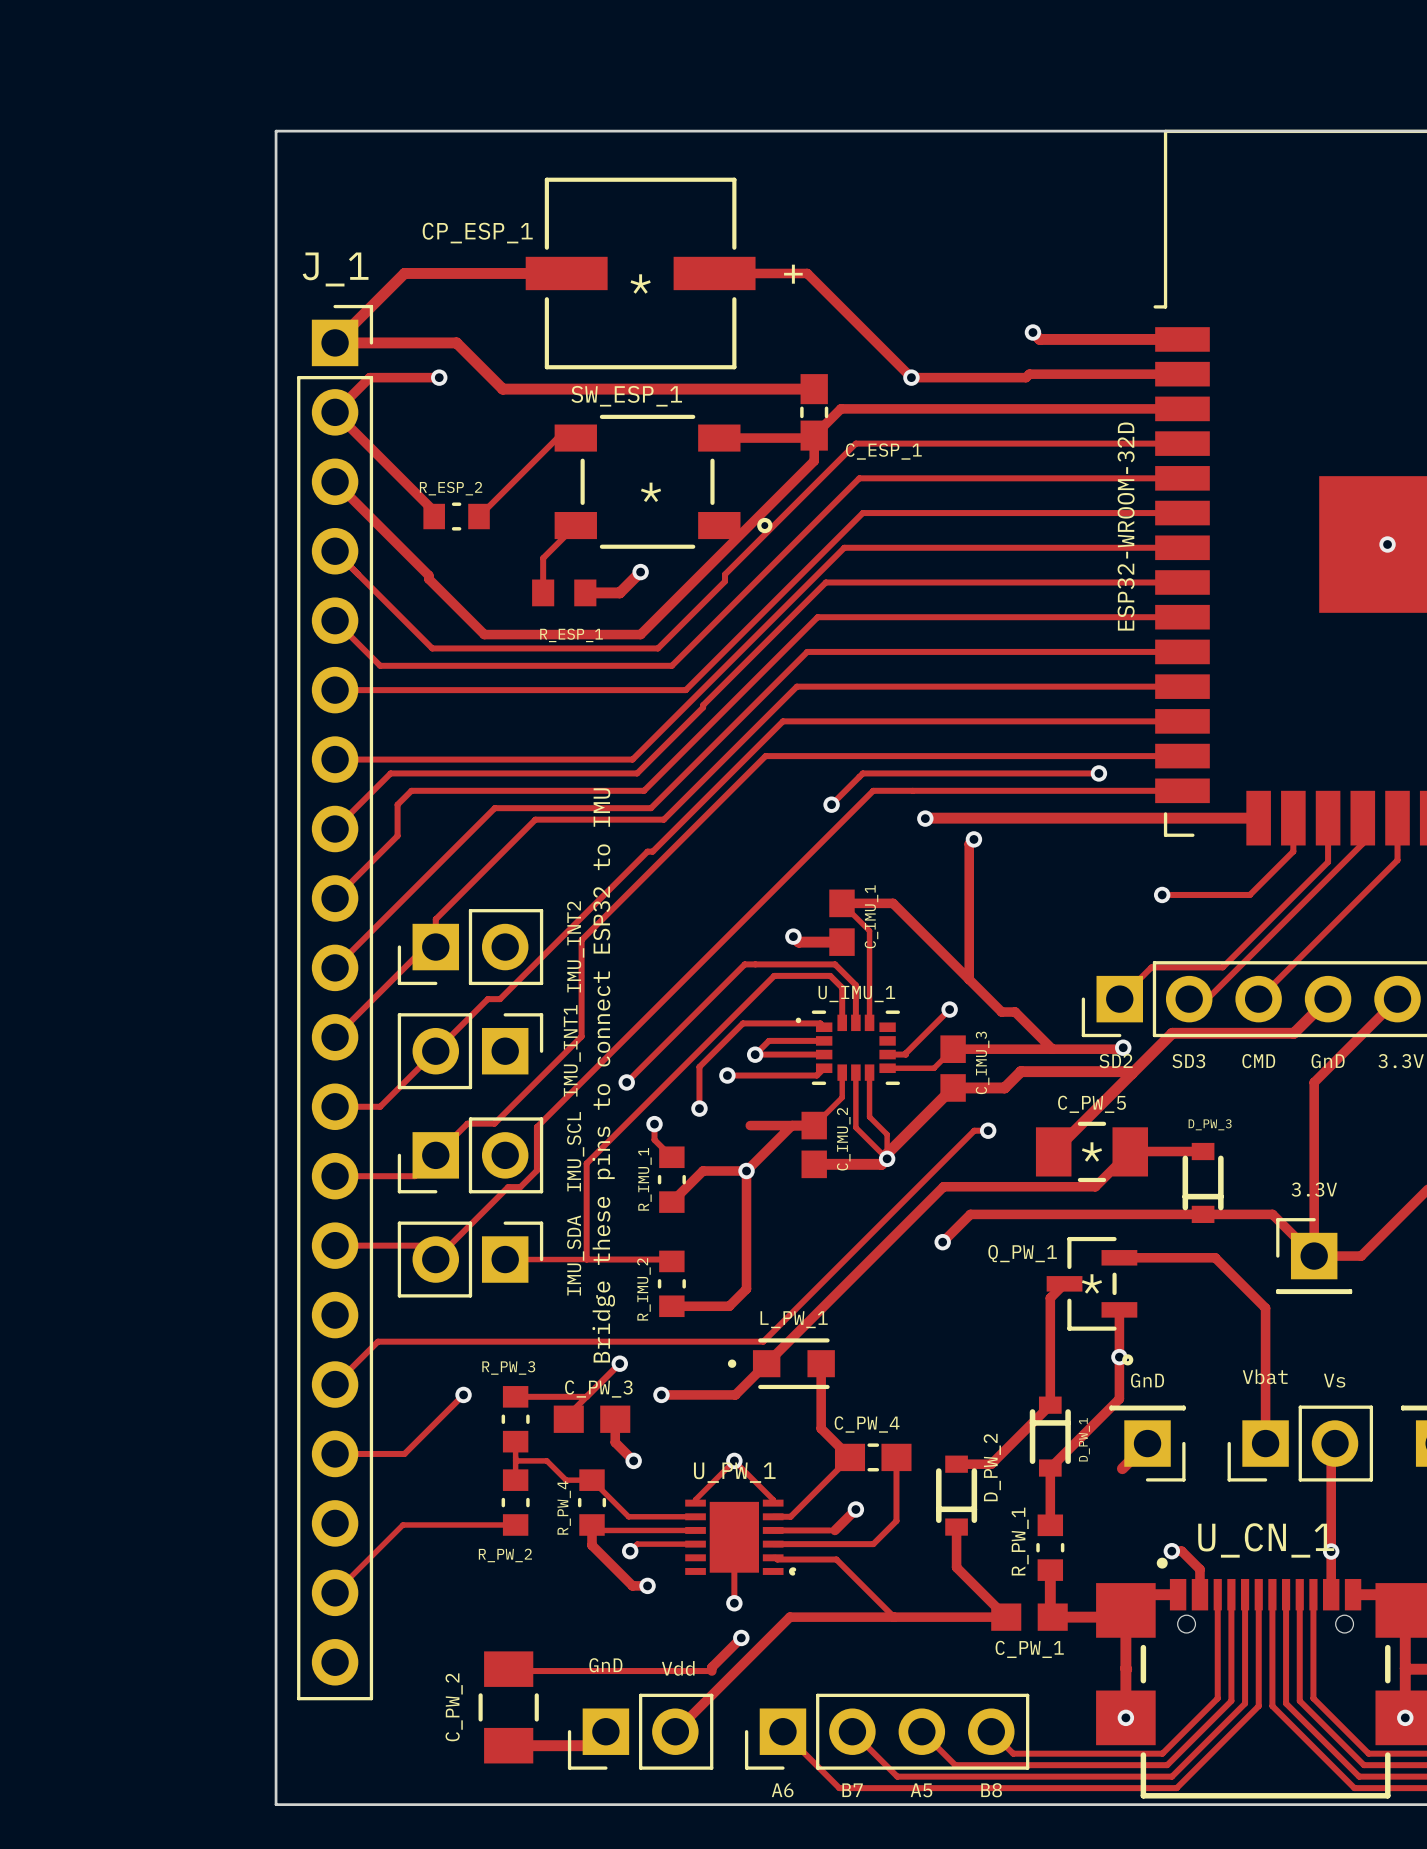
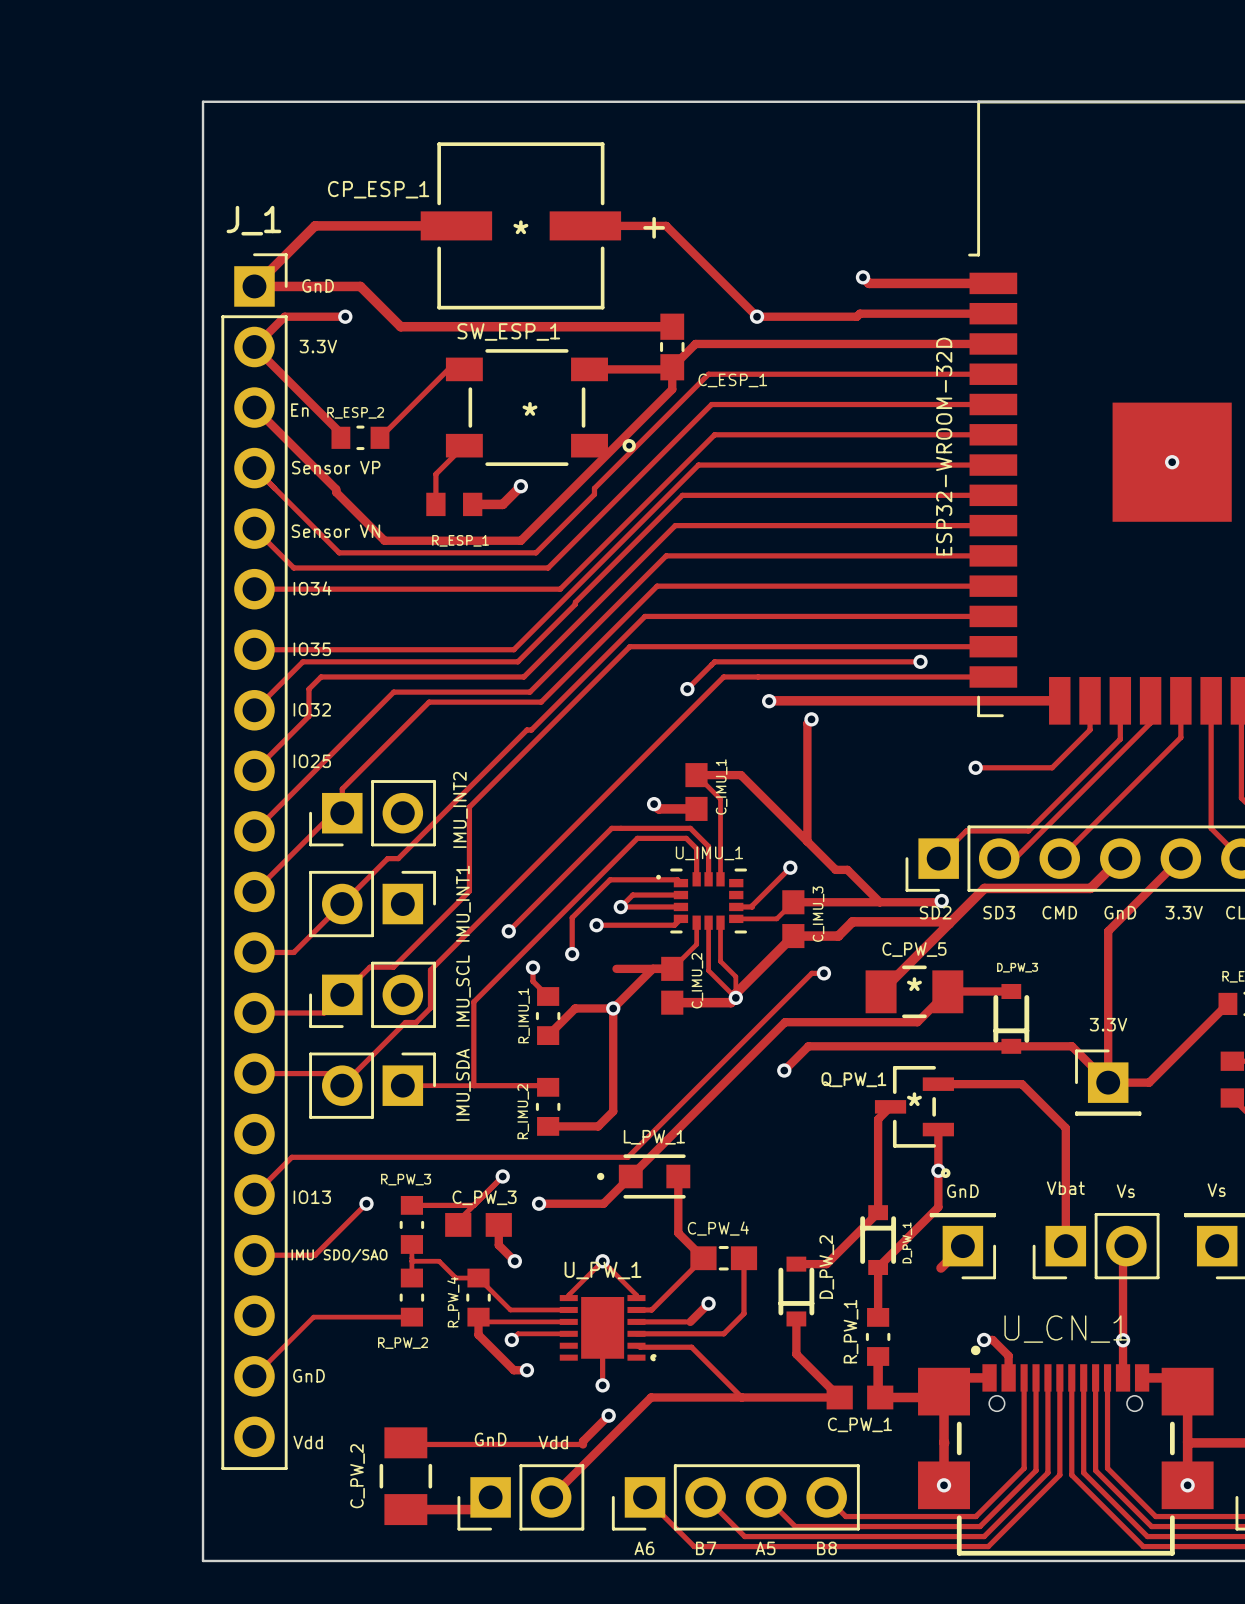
J_1 footprint: [297, 304, 374, 1701] -> [221, 253, 288, 1470]
part value: none -> IMU_INT2 (460, 809)
part text: IMU_INT2 (575, 946) -> none
part text: IMU_INT1 (572, 1050) -> none
part value: none -> IMU_INT1 (463, 903)
text: Bridge these pins to connect ESP32 to IMU (603, 1075) -> none
part text: IMU_SDA (575, 1255) -> none
part value: none -> IMU_SDA (463, 1084)

